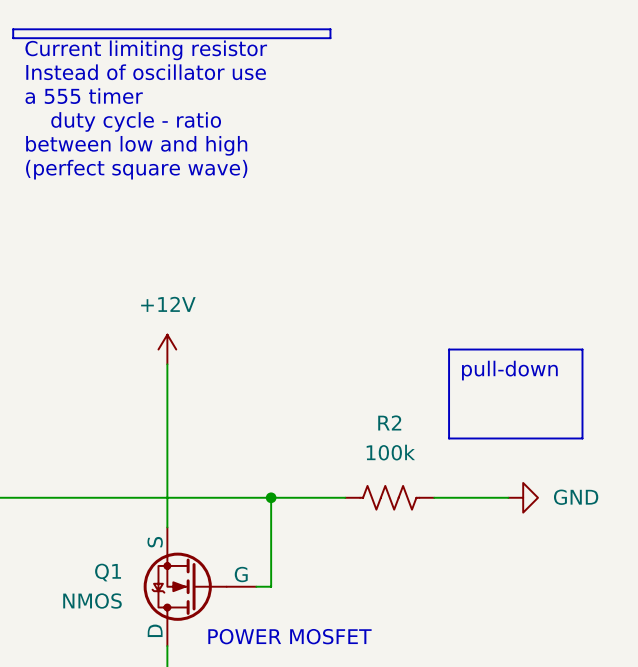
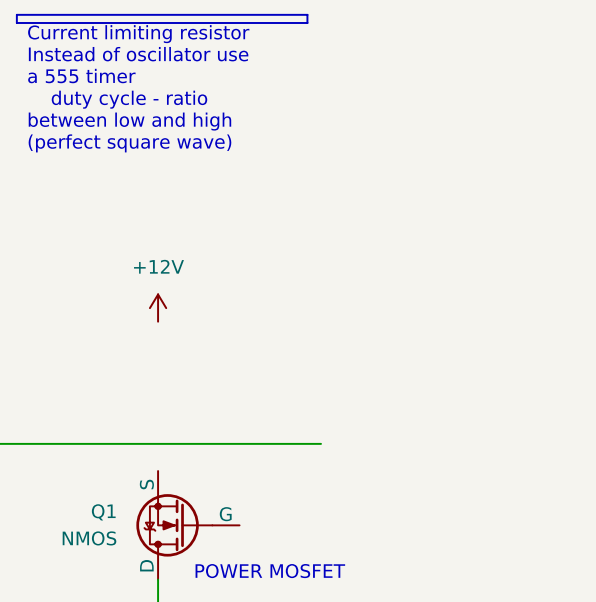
line: (449, 349) (582, 349) (582, 438) (449, 438) (449, 349) -> none
wire: (167, 364) (167, 527) -> none
text: pull-down (509, 370) -> none
wire: (271, 497) (271, 586) (256, 586) -> none
junction: (271, 497) -> none
R2: 100k (389, 497) -> none
wire: (434, 497) (508, 497) -> none
power symbol: GND (523, 497) -> none

